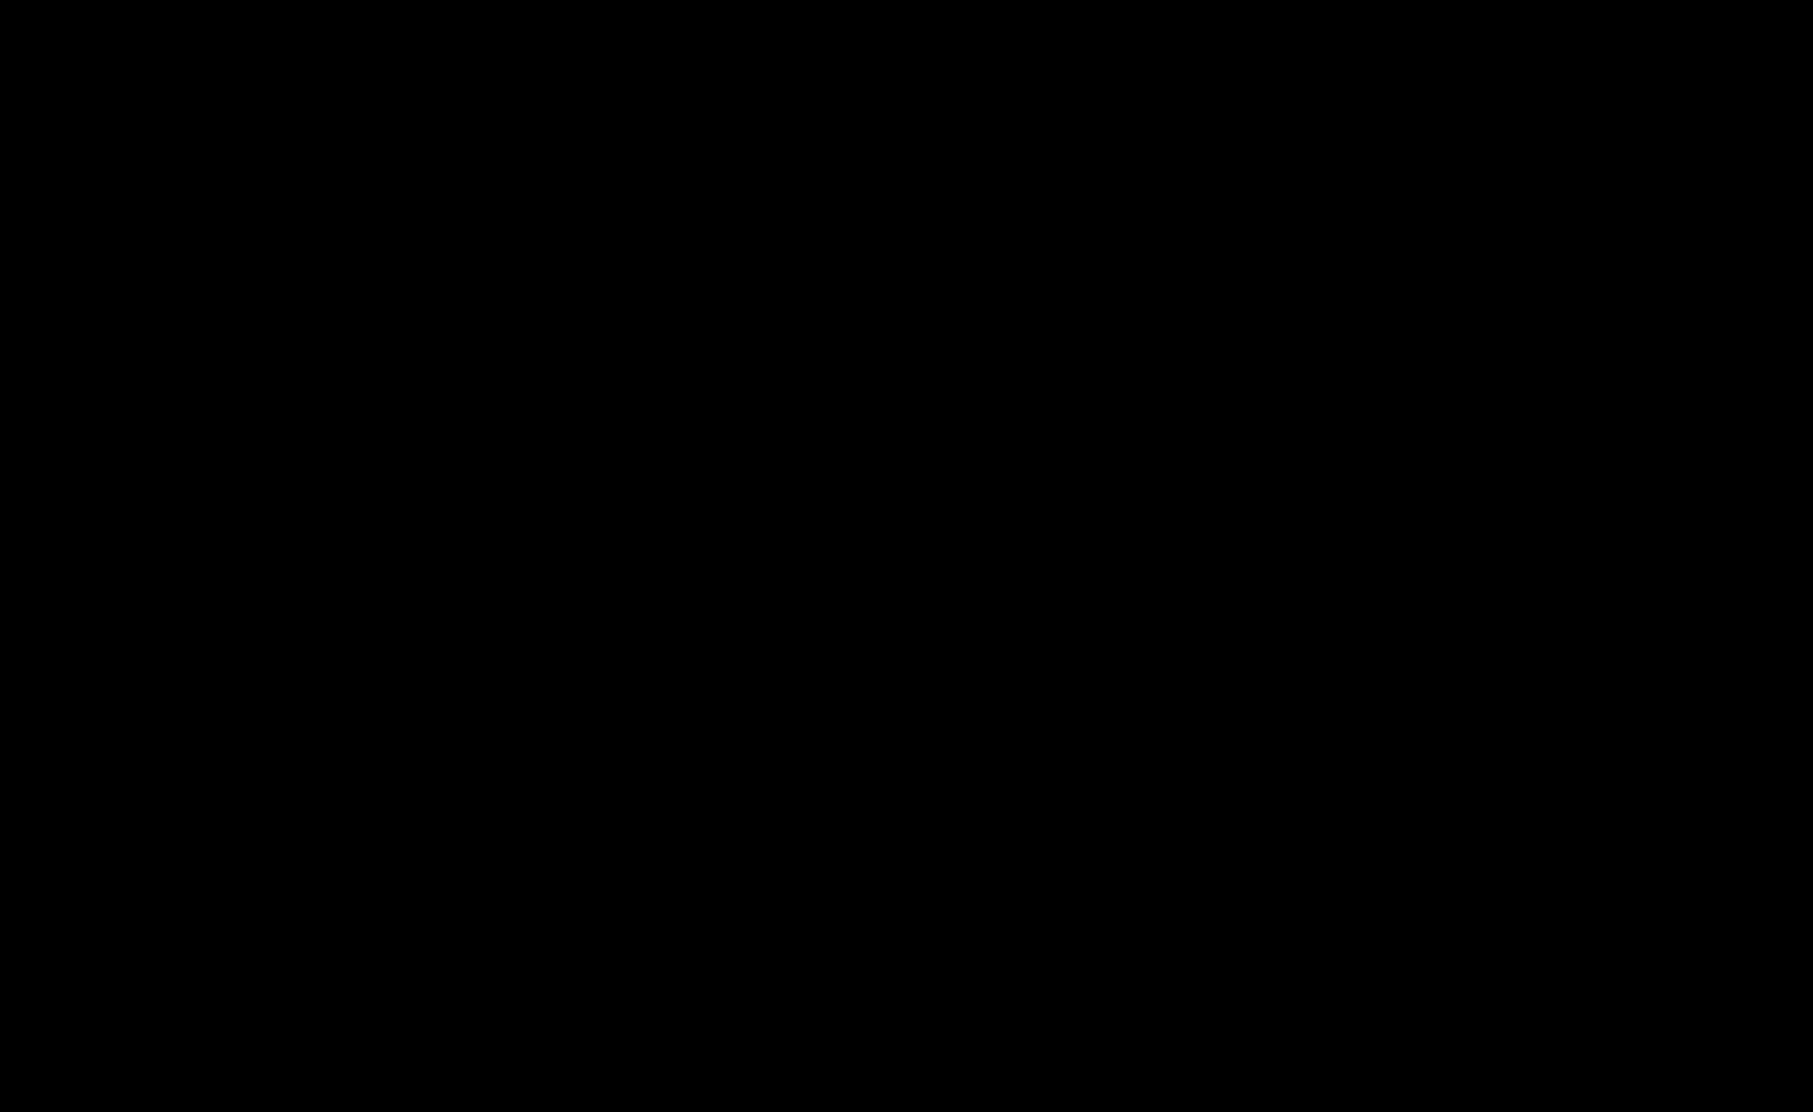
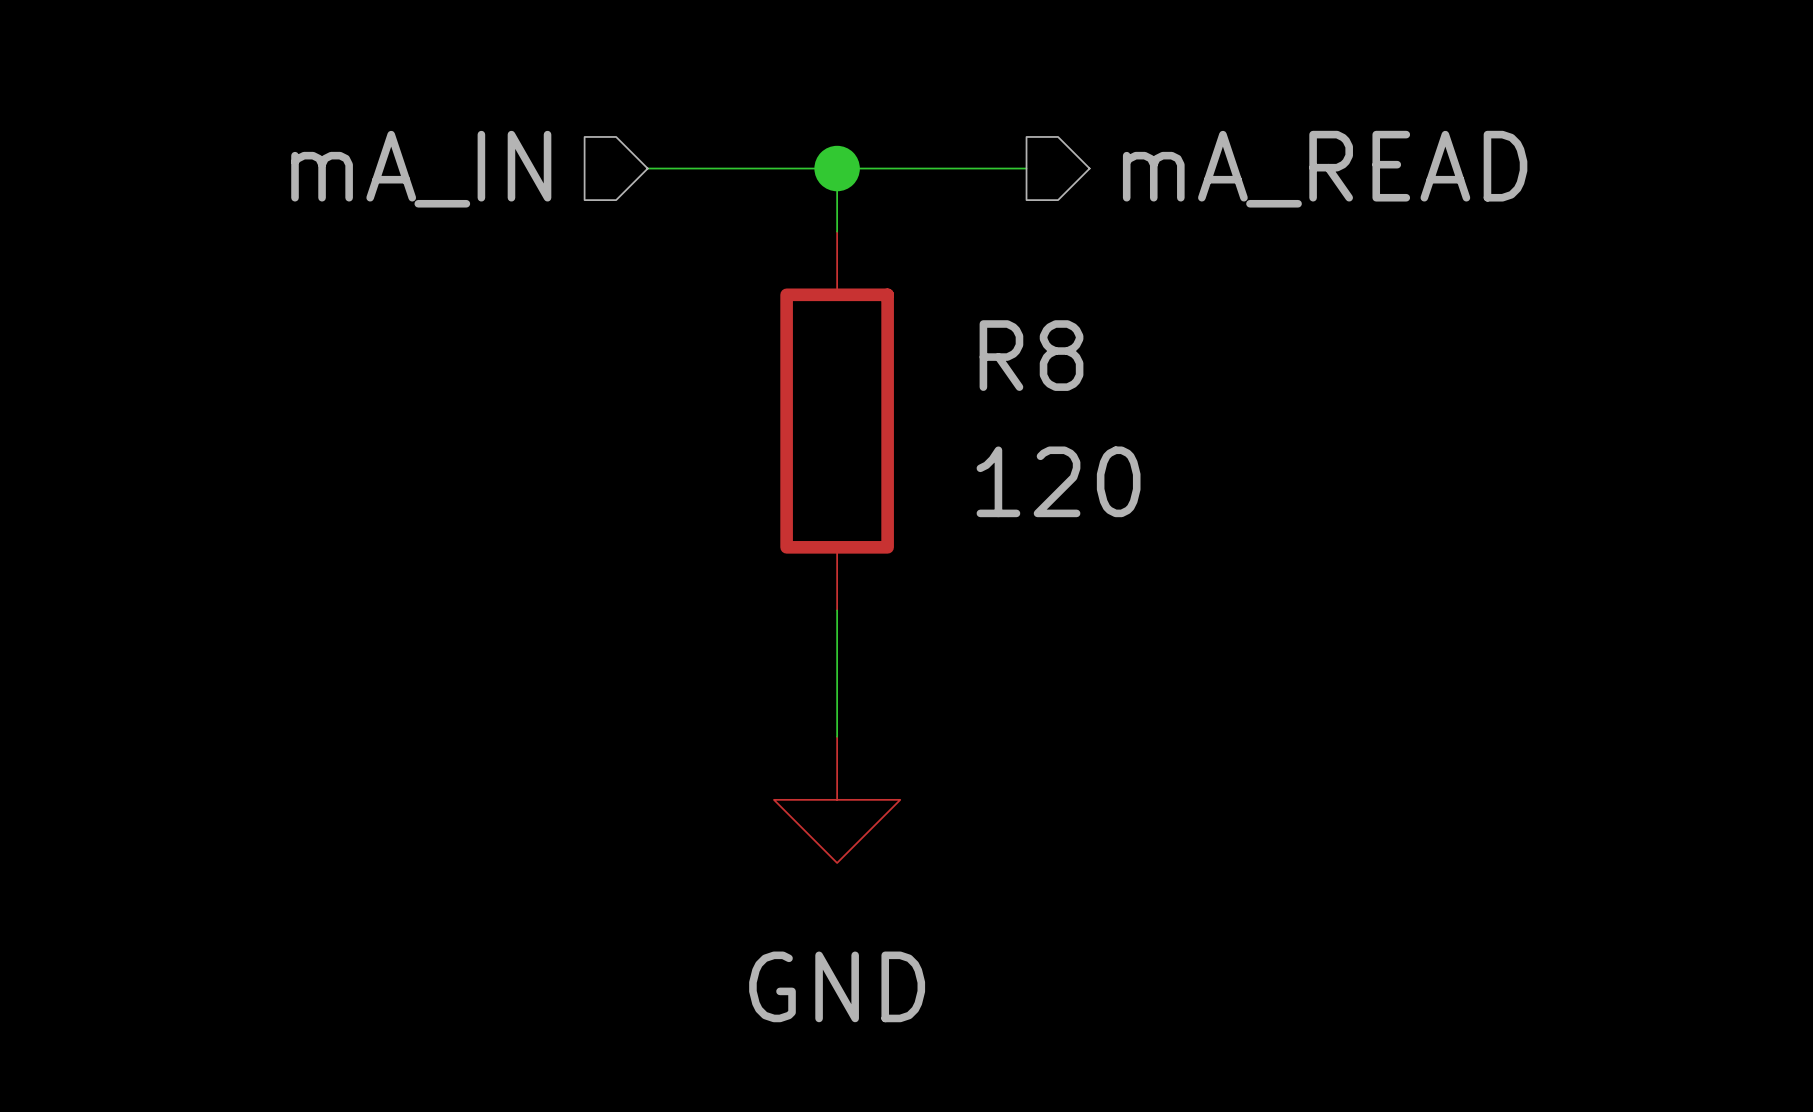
wire: none -> (647, 168) (1026, 168)
wire: none -> (837, 168) (837, 231)
junction: none -> (837, 168)
hierarchical label: none -> mA_IN (421, 169)
hierarchical label: none -> mA_READ (1325, 169)
R8: none -> 120 (837, 421)
wire: none -> (837, 610) (837, 736)
power symbol: none -> GND (837, 799)

